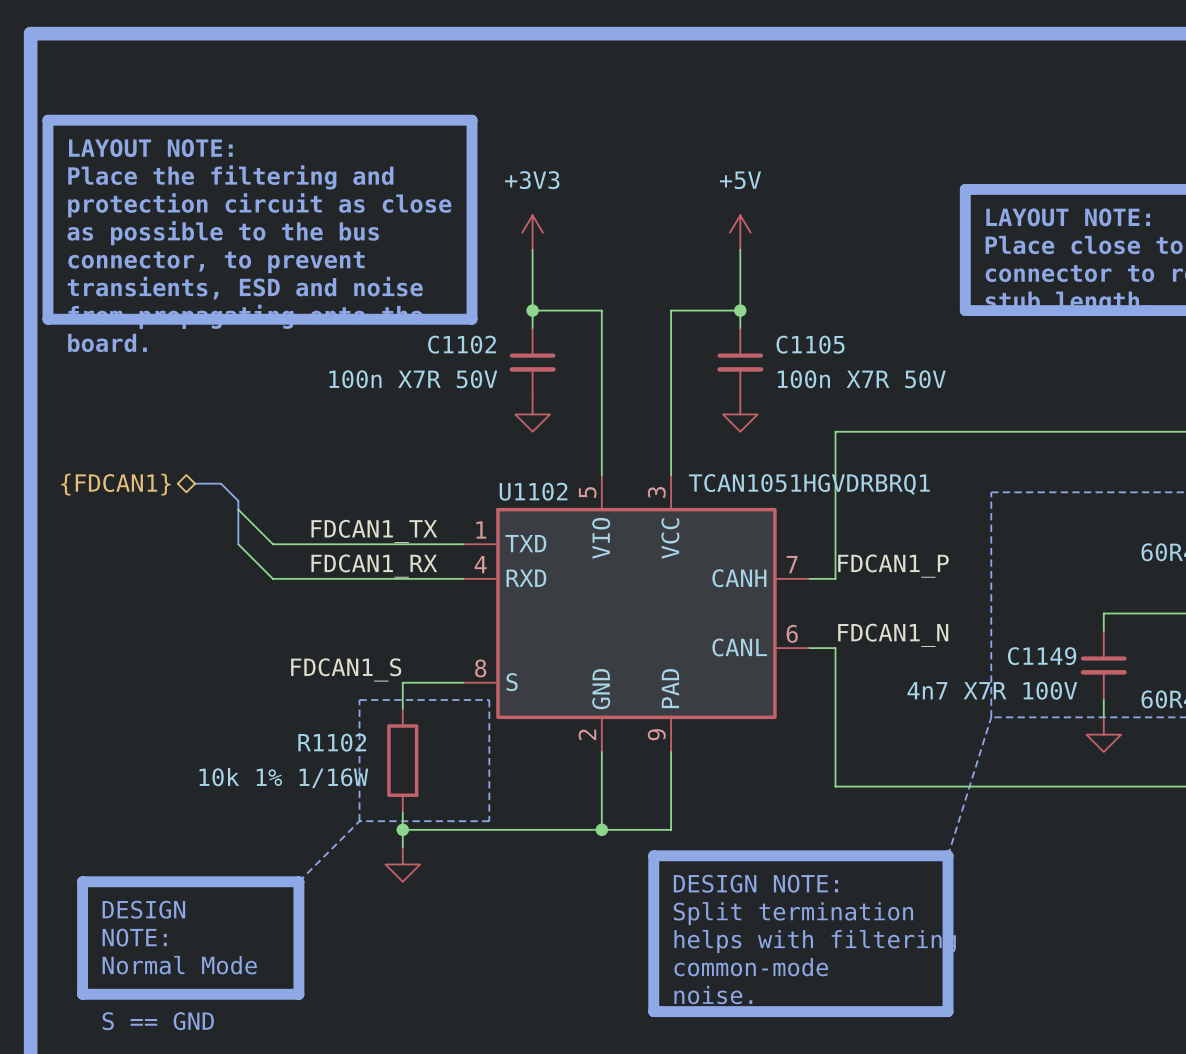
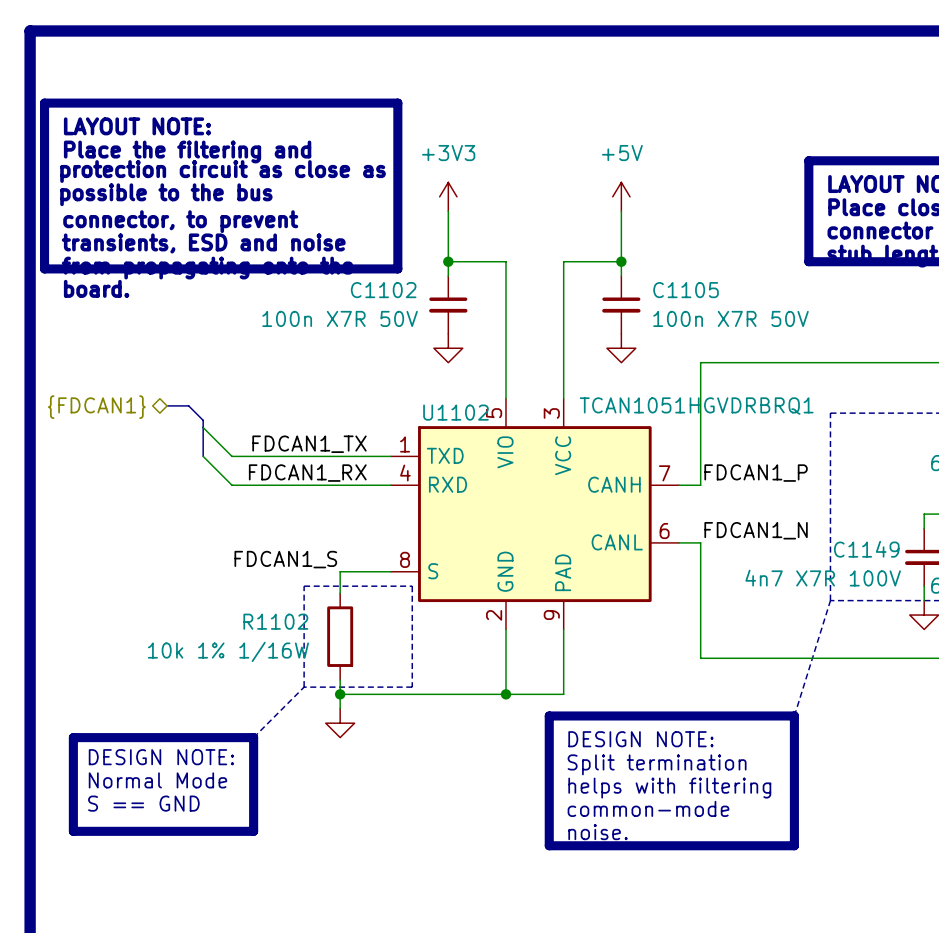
text: protection circuit as close (259, 205) -> protection circuit as close as (223, 171)
text: as possible to the bus (223, 233) -> possible to the bus (166, 194)
text: DESIGN (143, 909) -> DESIGN NOTE: (161, 757)
text: NOTE: (134, 937) -> Normal Mode (157, 780)
text: Normal Mode (179, 965) -> S == GND (143, 803)
text: S == GND (158, 1021) -> none

